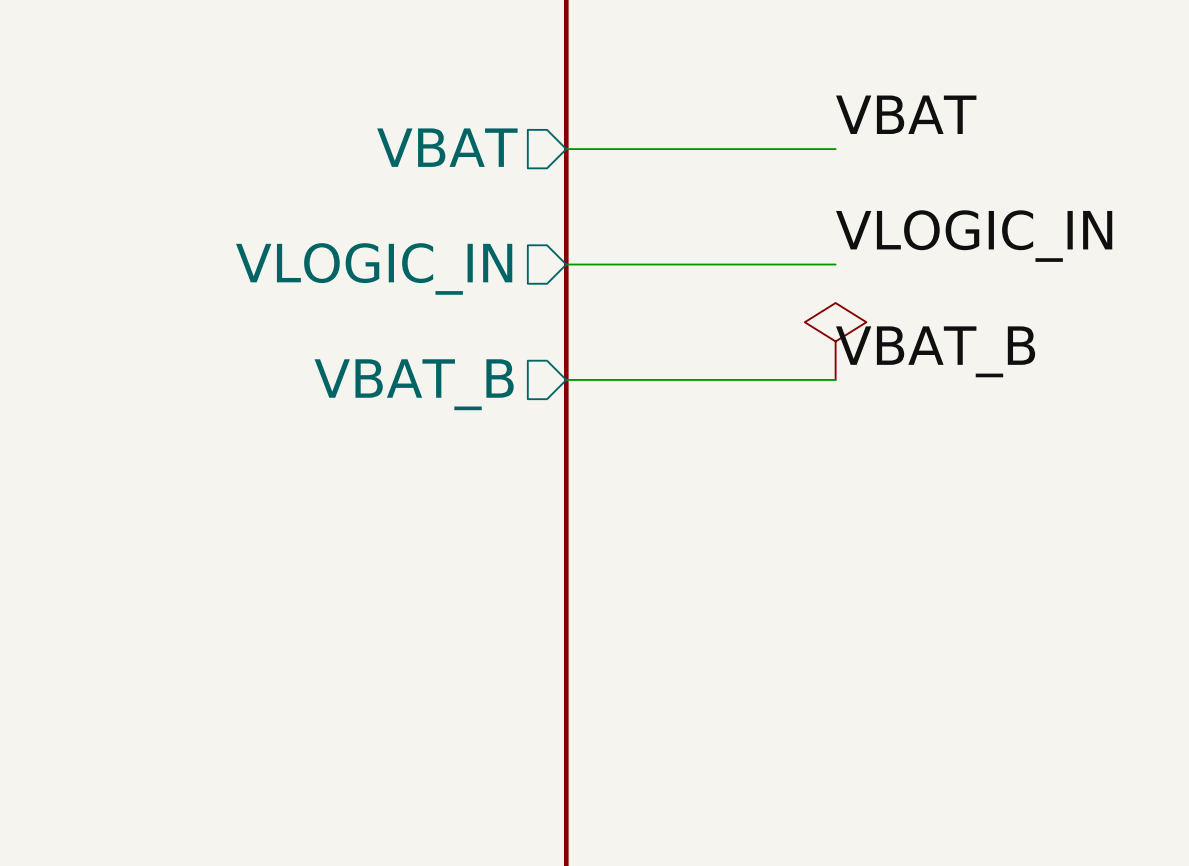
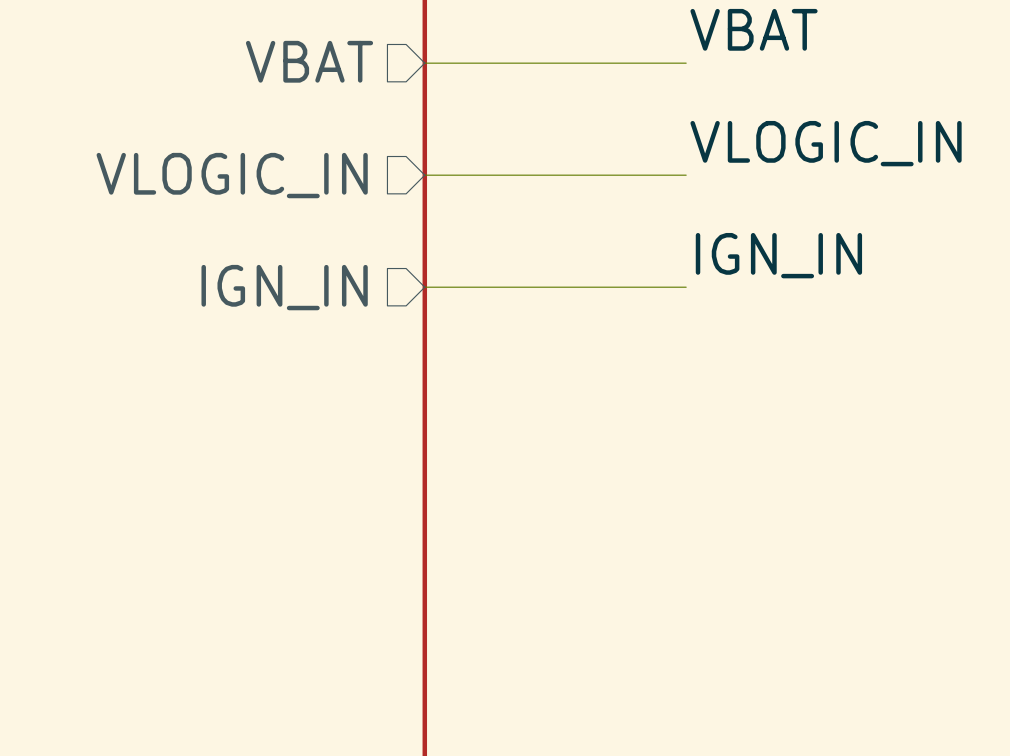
power symbol: (835, 341) -> none
label: VBAT_B (935, 351) -> IGN_IN (778, 255)
sheet pin: VBAT_B (414, 384) -> IGN_IN (284, 287)

